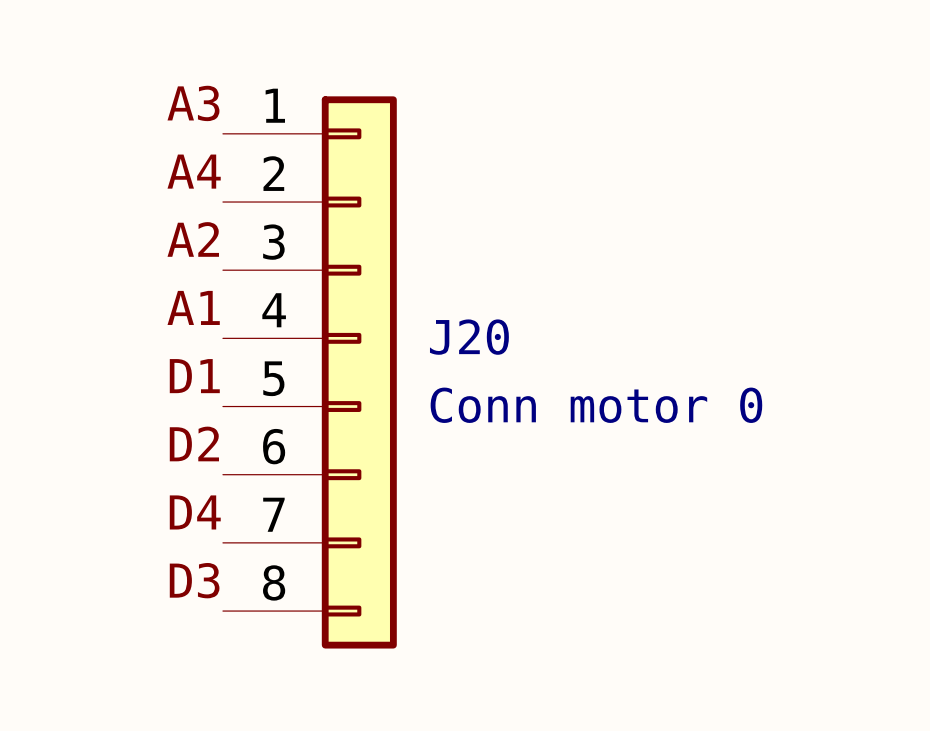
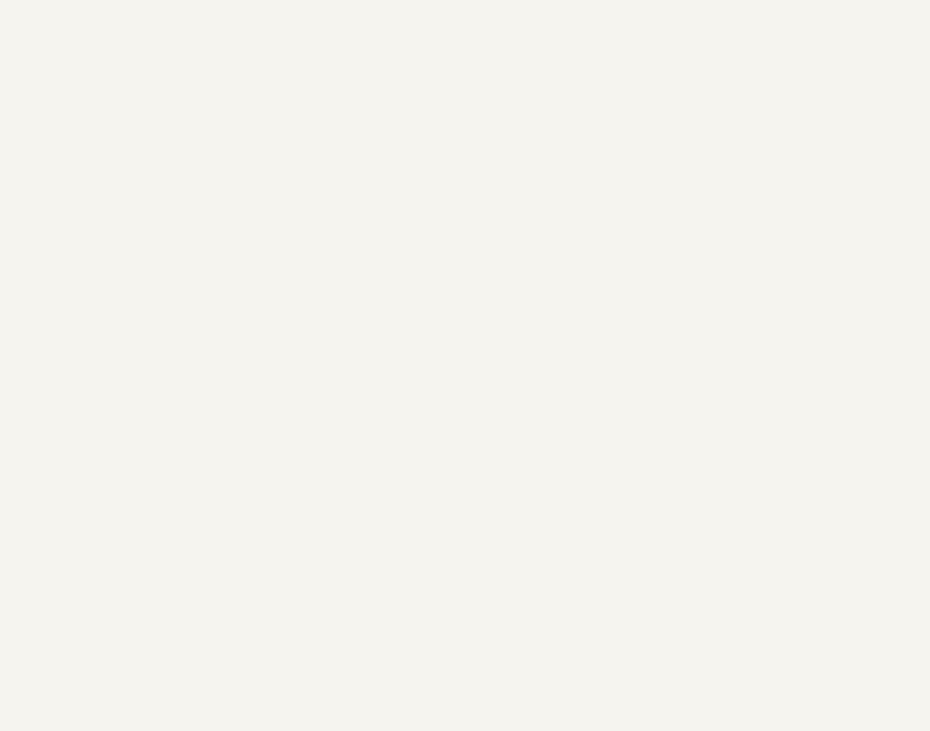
label: A3 (193, 103) -> none
label: A4 (194, 171) -> none
label: A2 (193, 239) -> none
label: A1 (193, 307) -> none
J20: Conn motor 0 (309, 372) -> none
label: D1 (194, 376) -> none
label: D2 (194, 443) -> none
label: D4 (195, 512) -> none
label: D3 (194, 580) -> none

